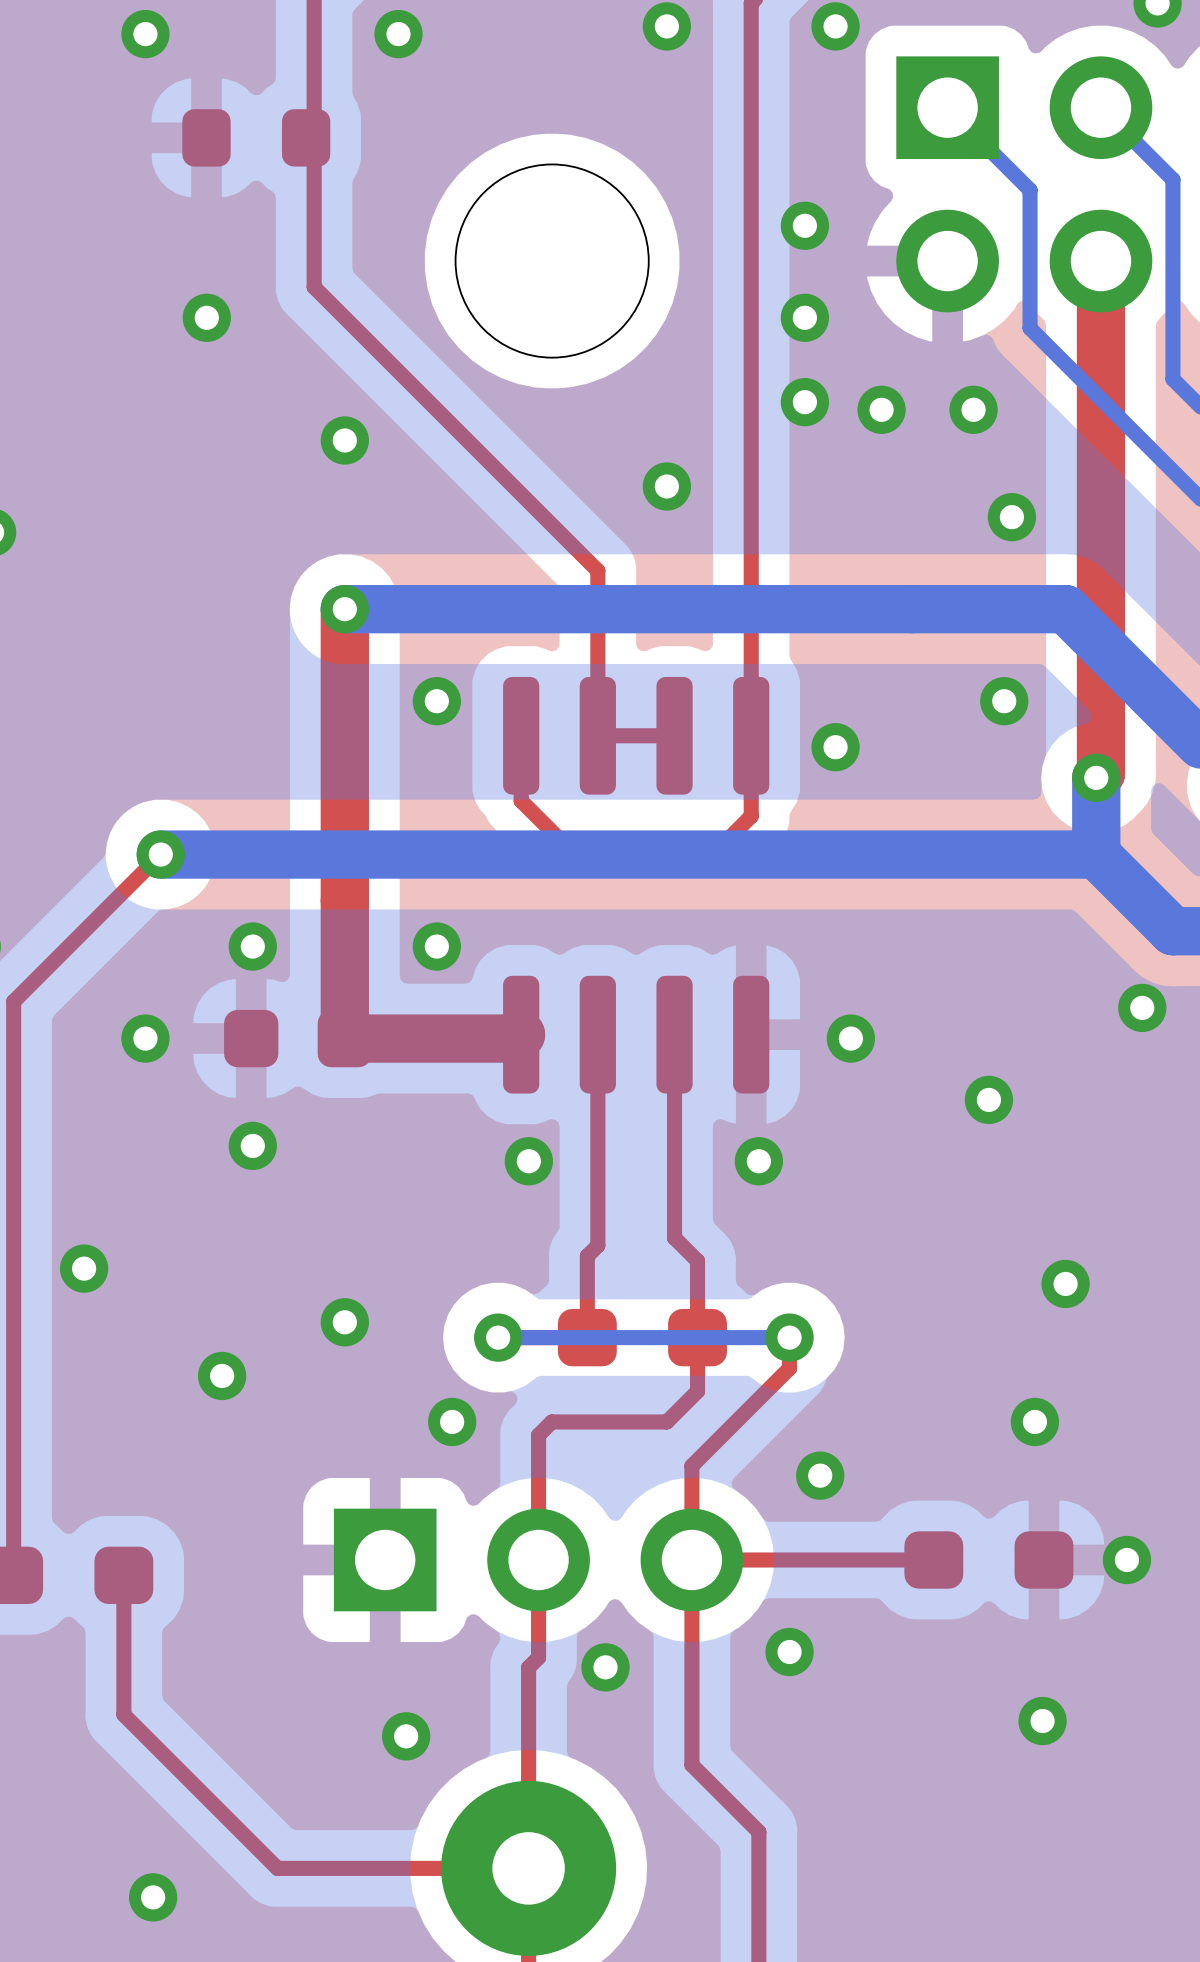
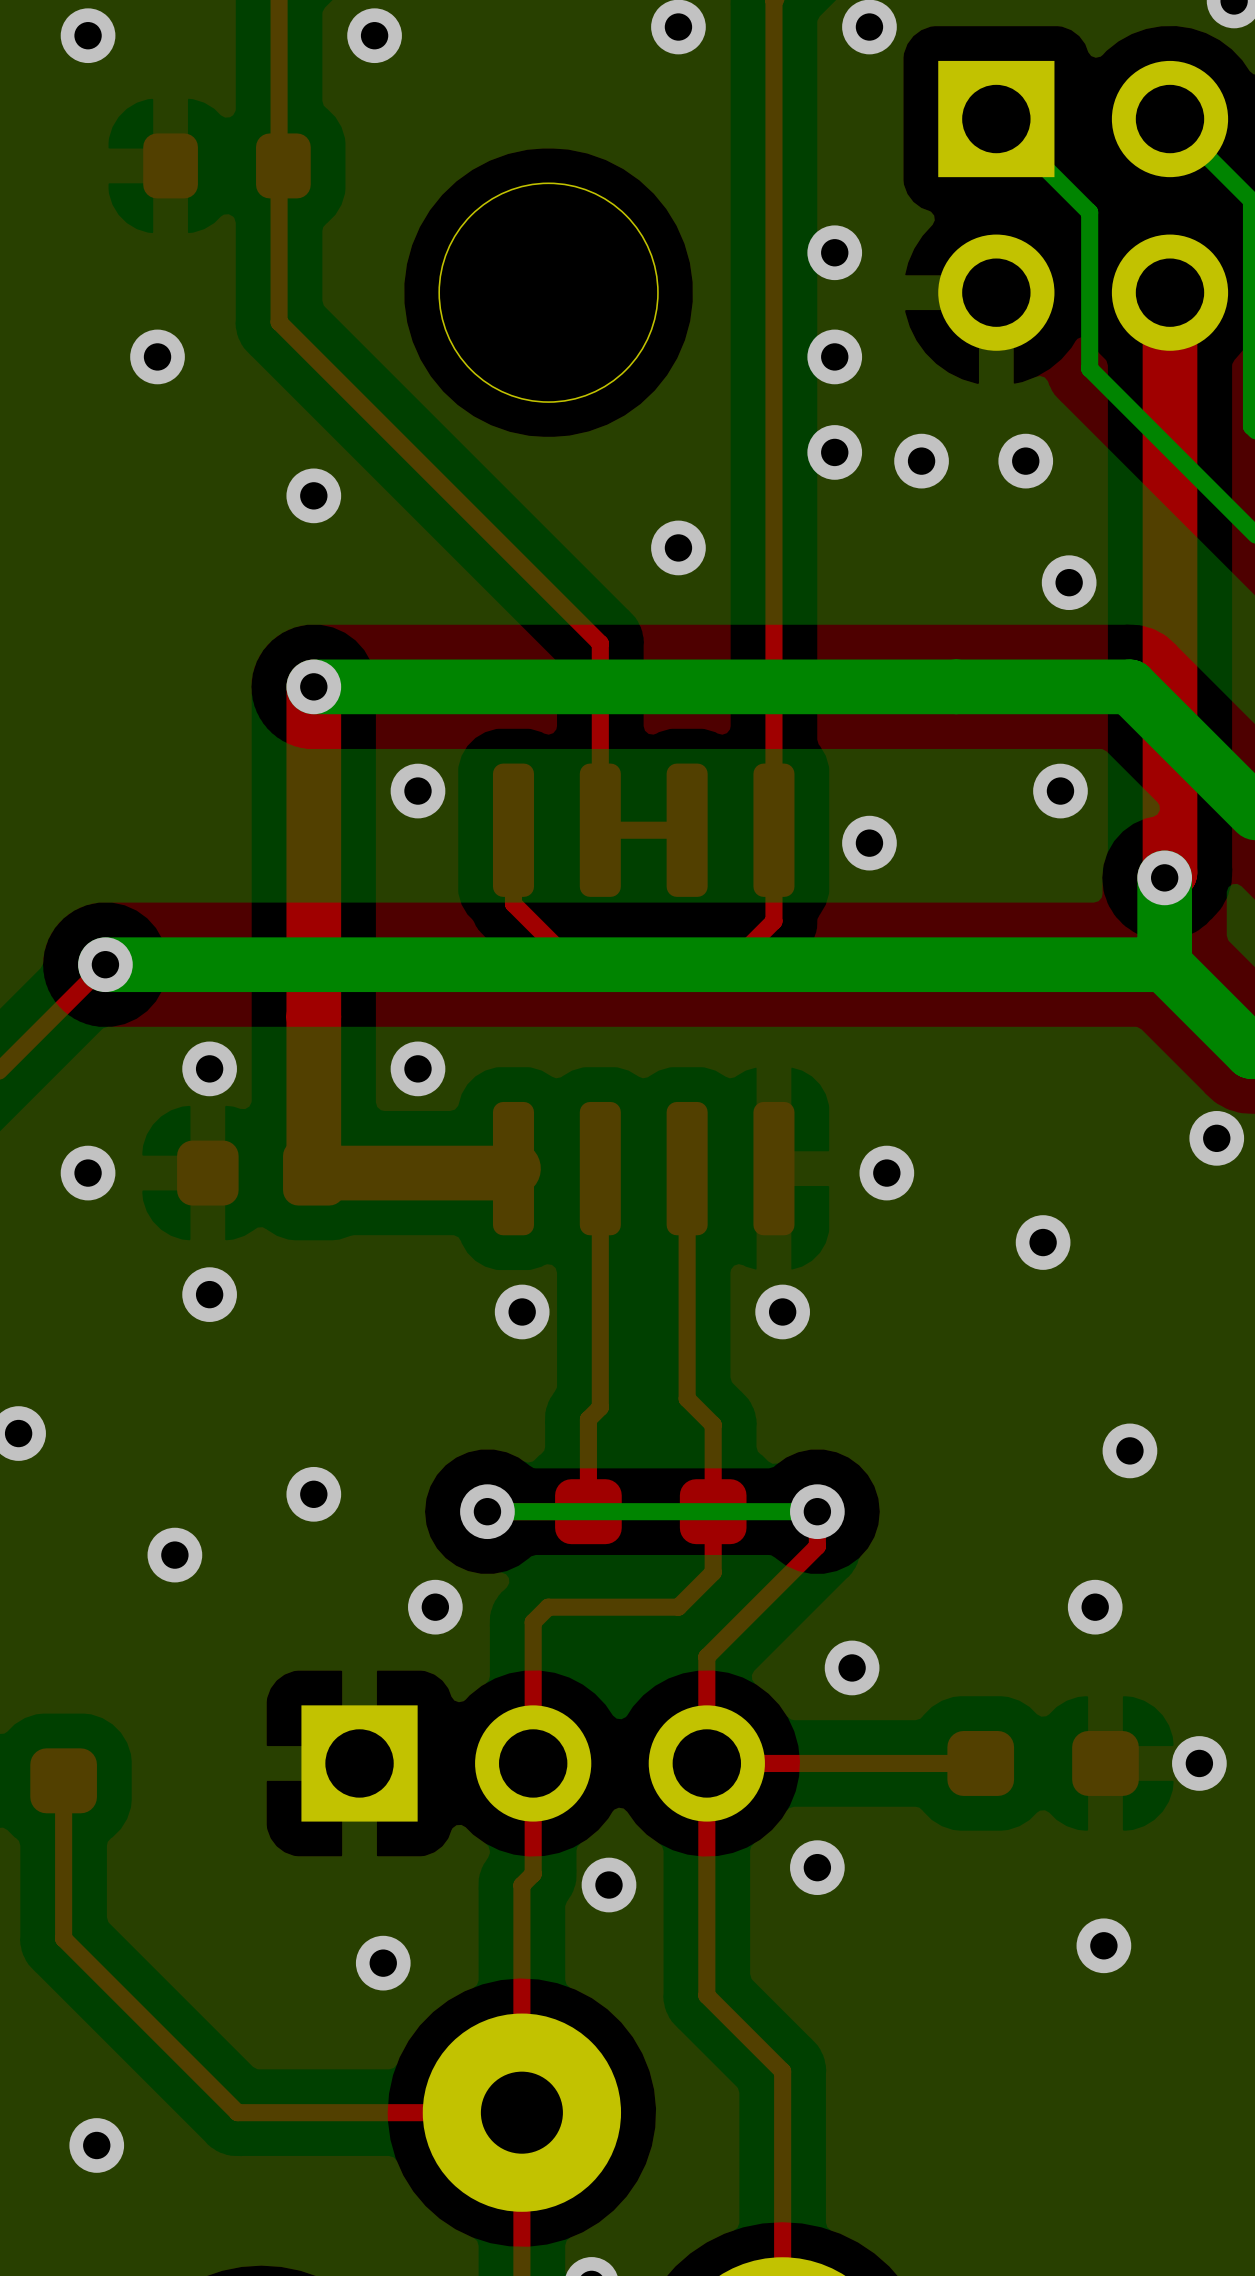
part position: (256, 137) -> (226, 165)

